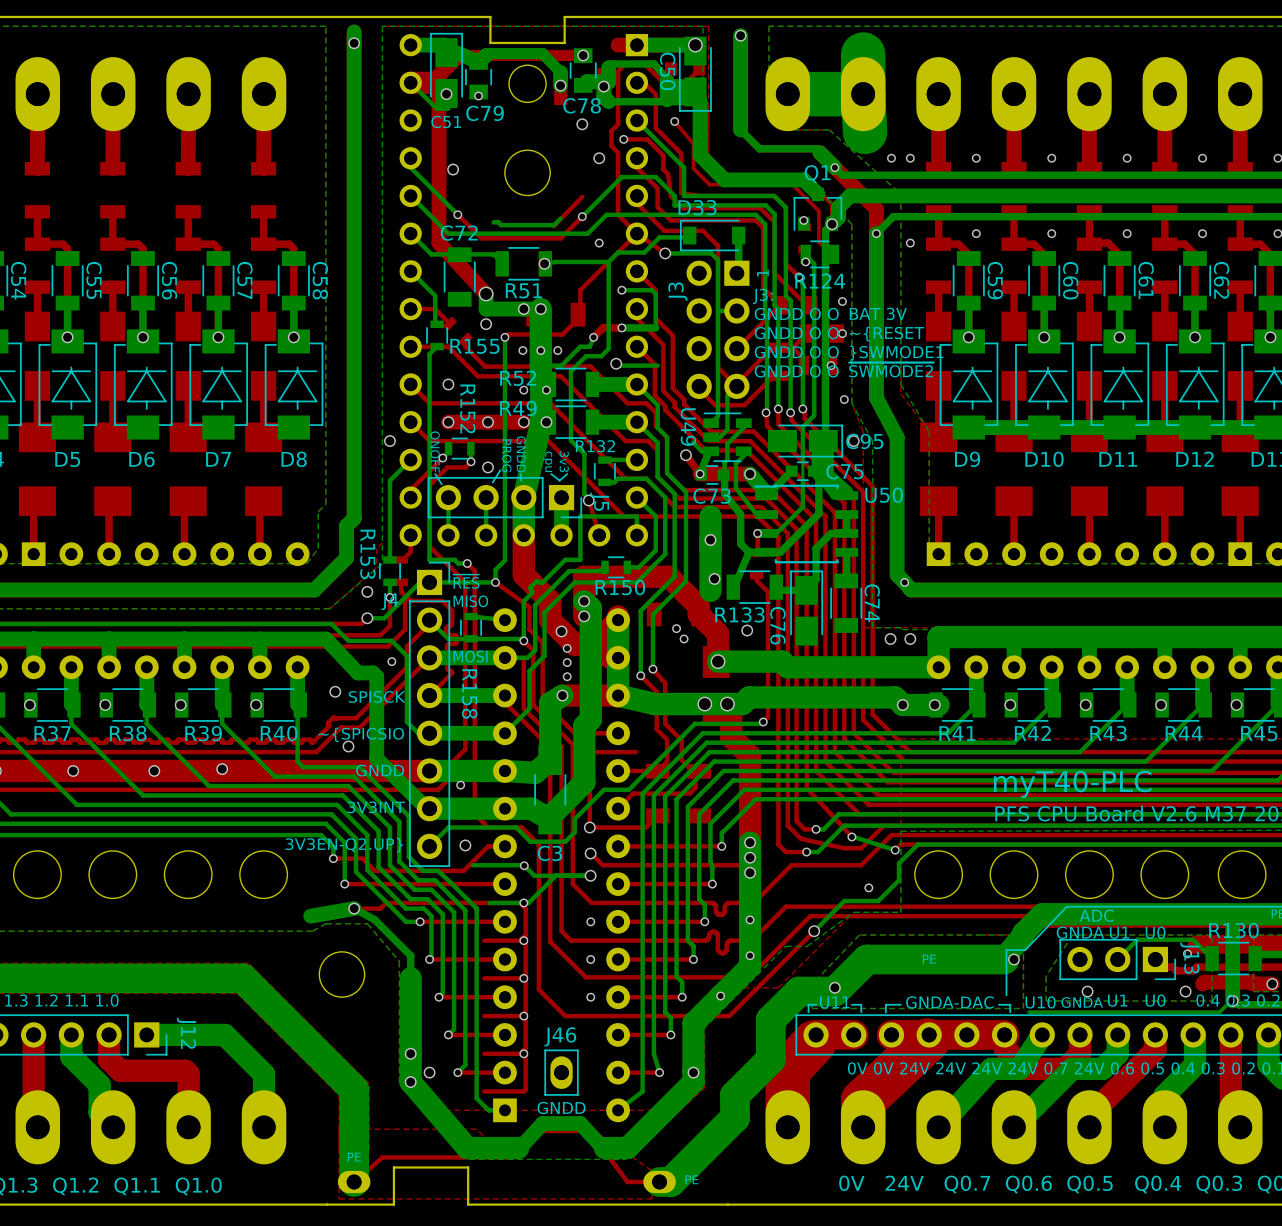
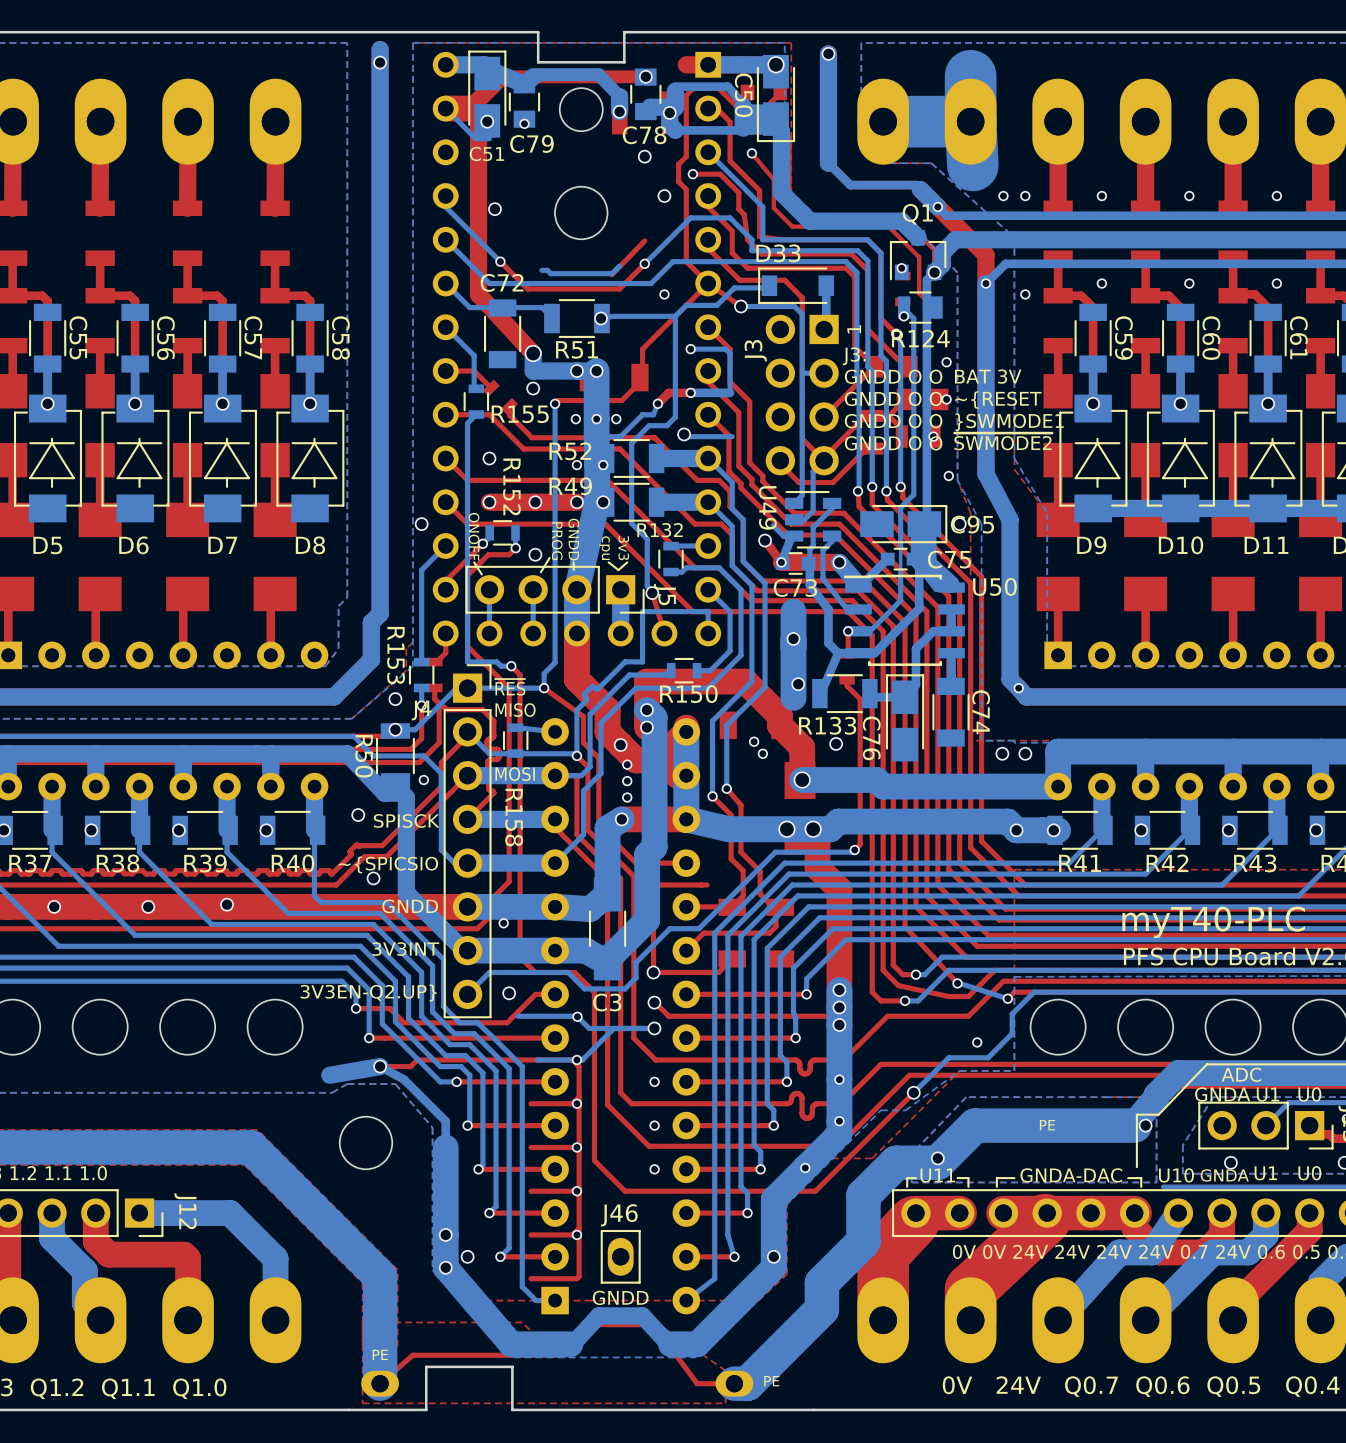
R50: none -> (395, 755)

